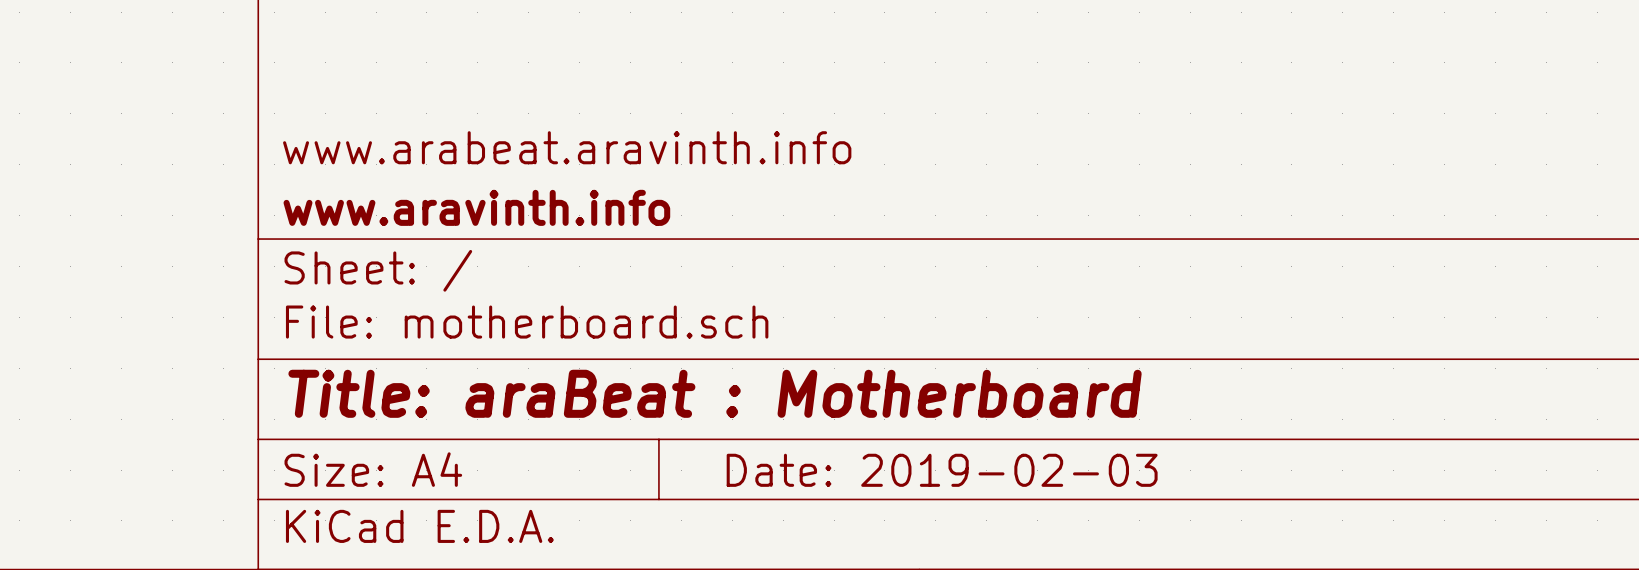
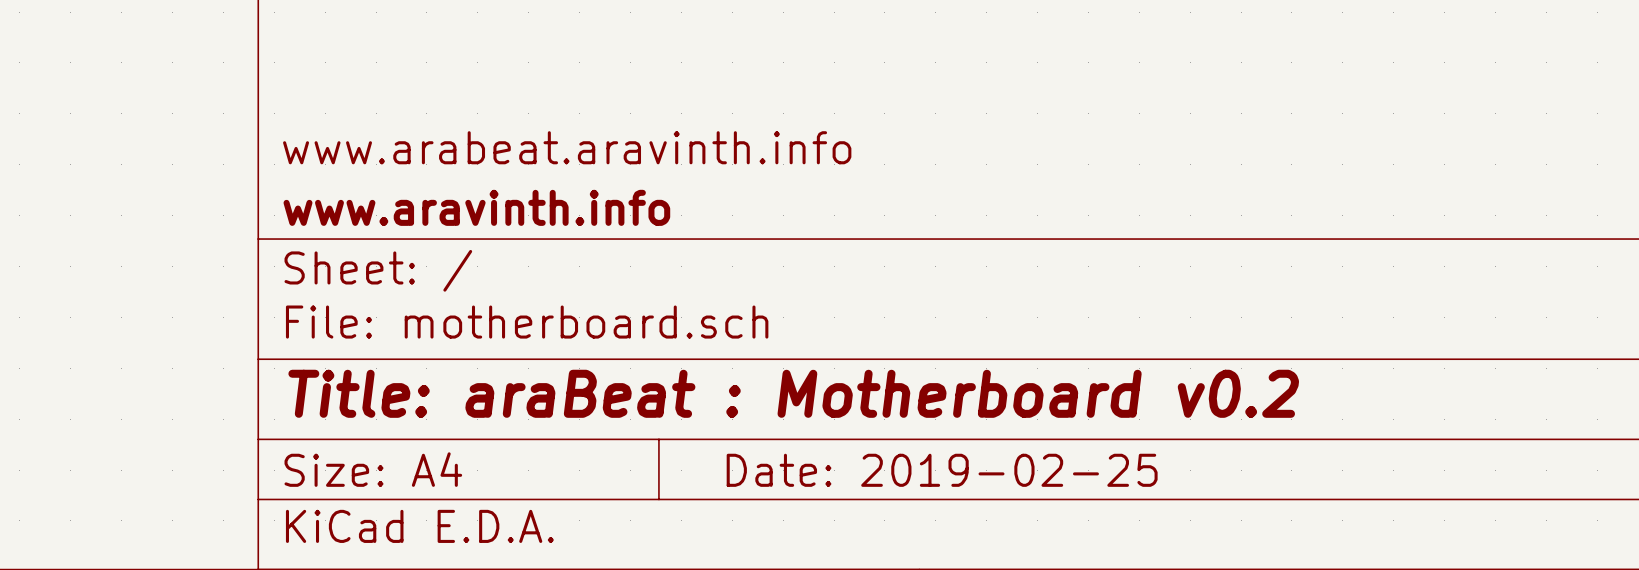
title block: Title: araBeat : Motherboard (715, 393) -> Title: araBeat : Motherboard v0.2 (793, 393)
title block: Date: 2019-02-03 (942, 470) -> Date: 2019-02-25 (942, 470)

